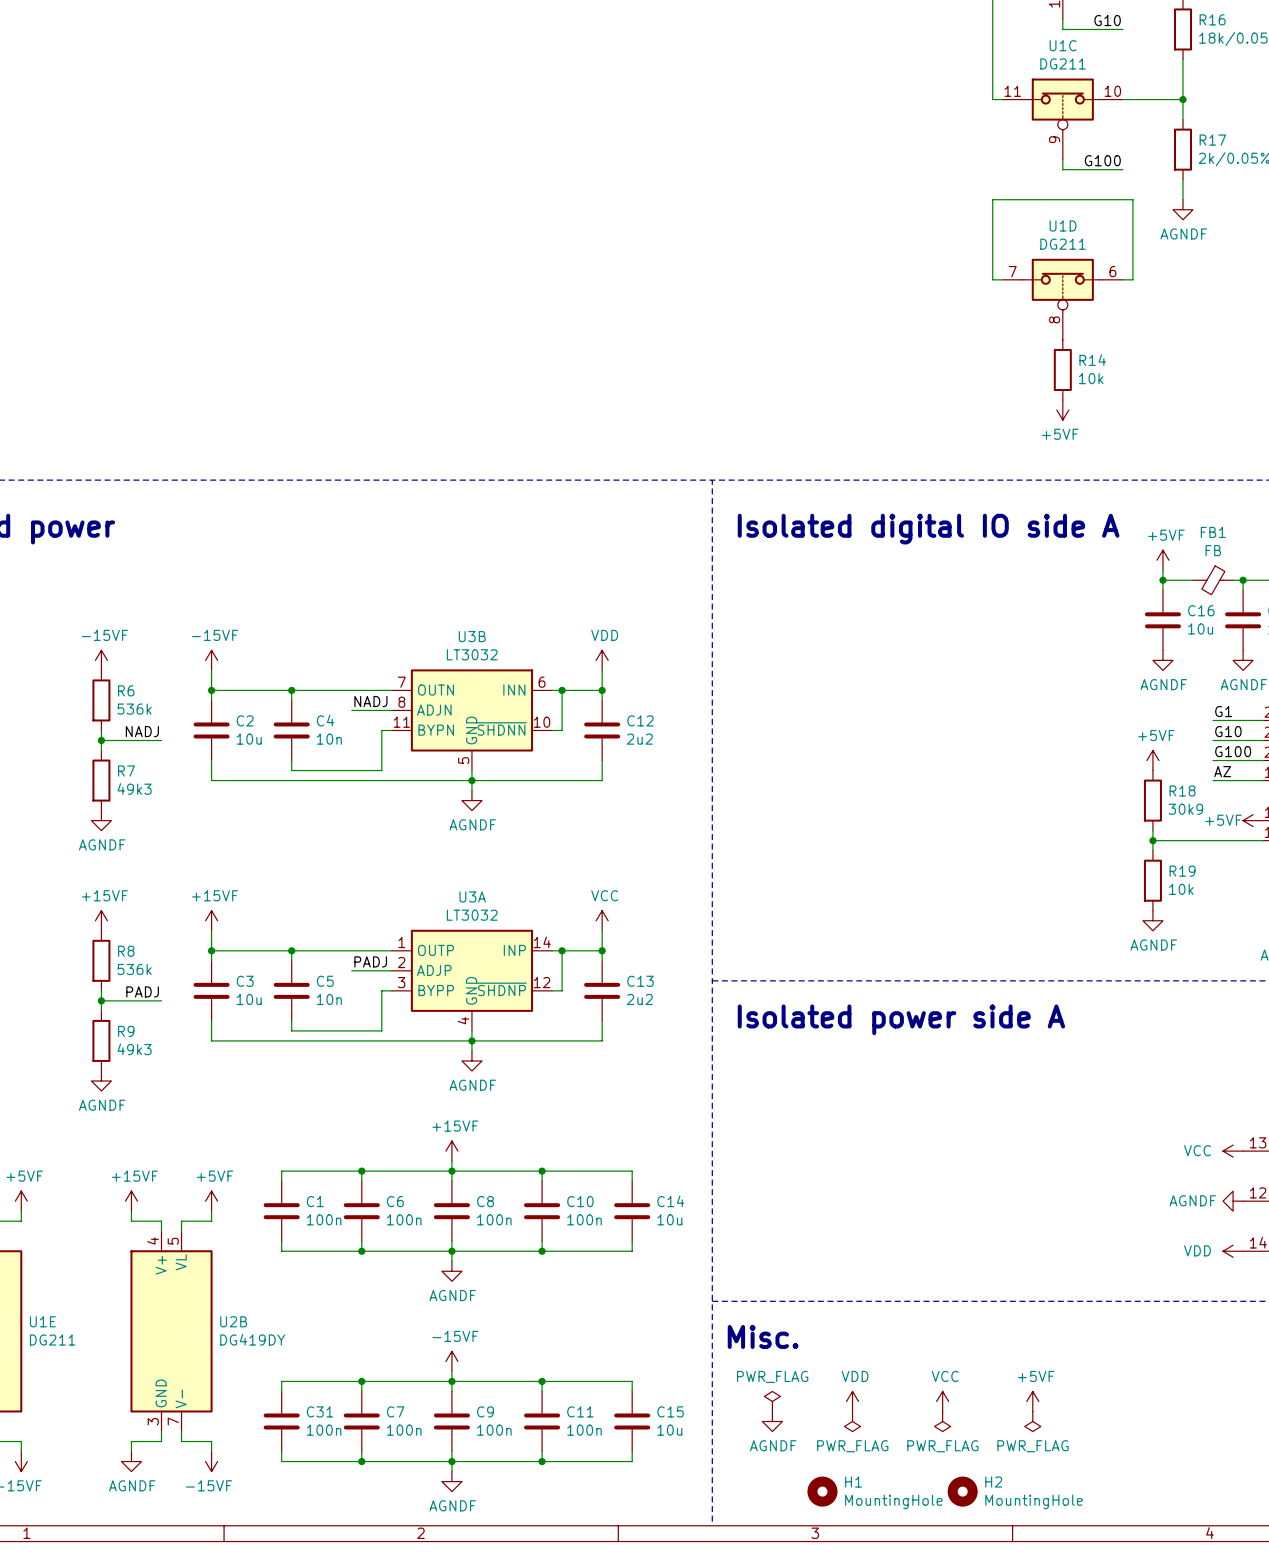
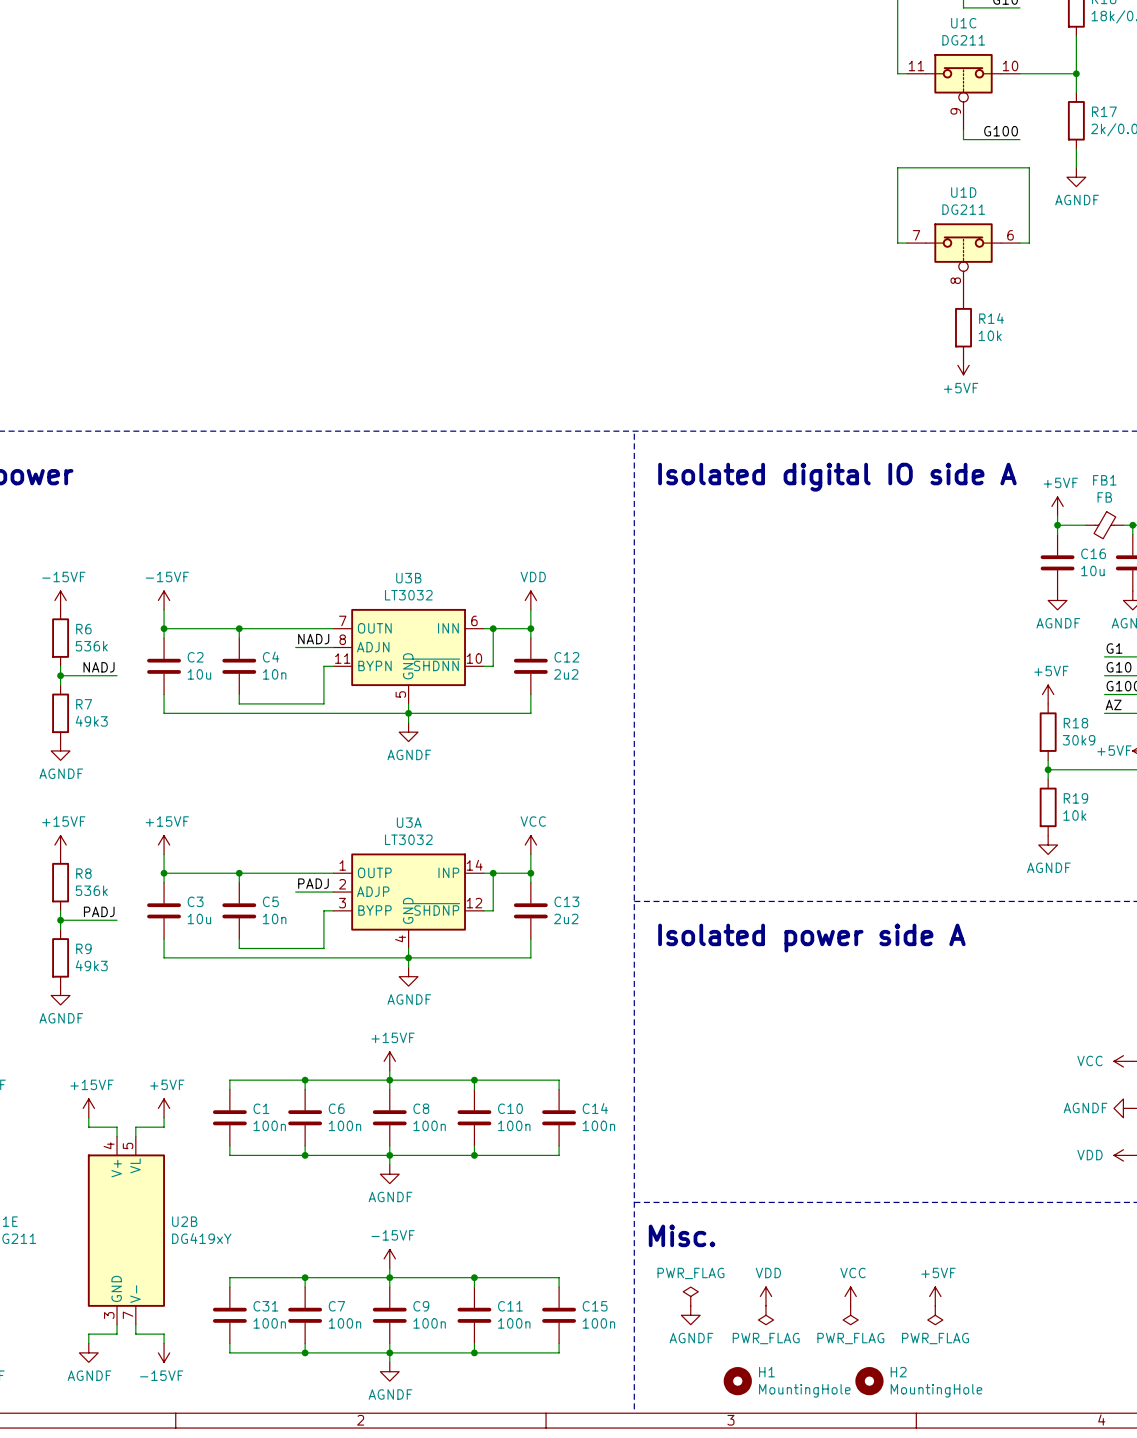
C14 value: 10u (669, 1219) -> 100n (598, 1125)
U2B value: DG419DY (252, 1339) -> DG419xY (201, 1238)
C15 value: 10u (669, 1430) -> 100n (598, 1323)

